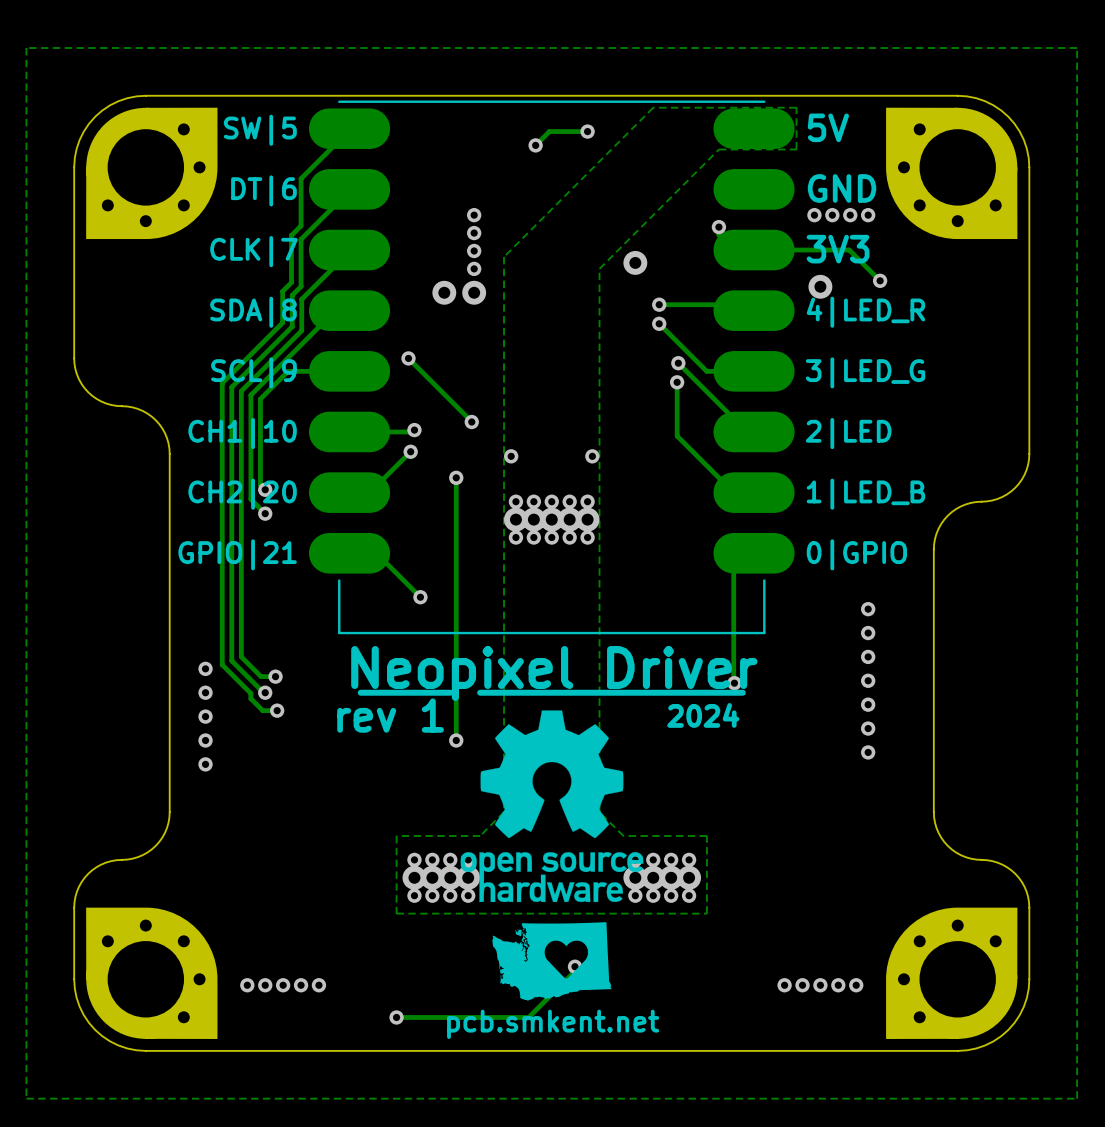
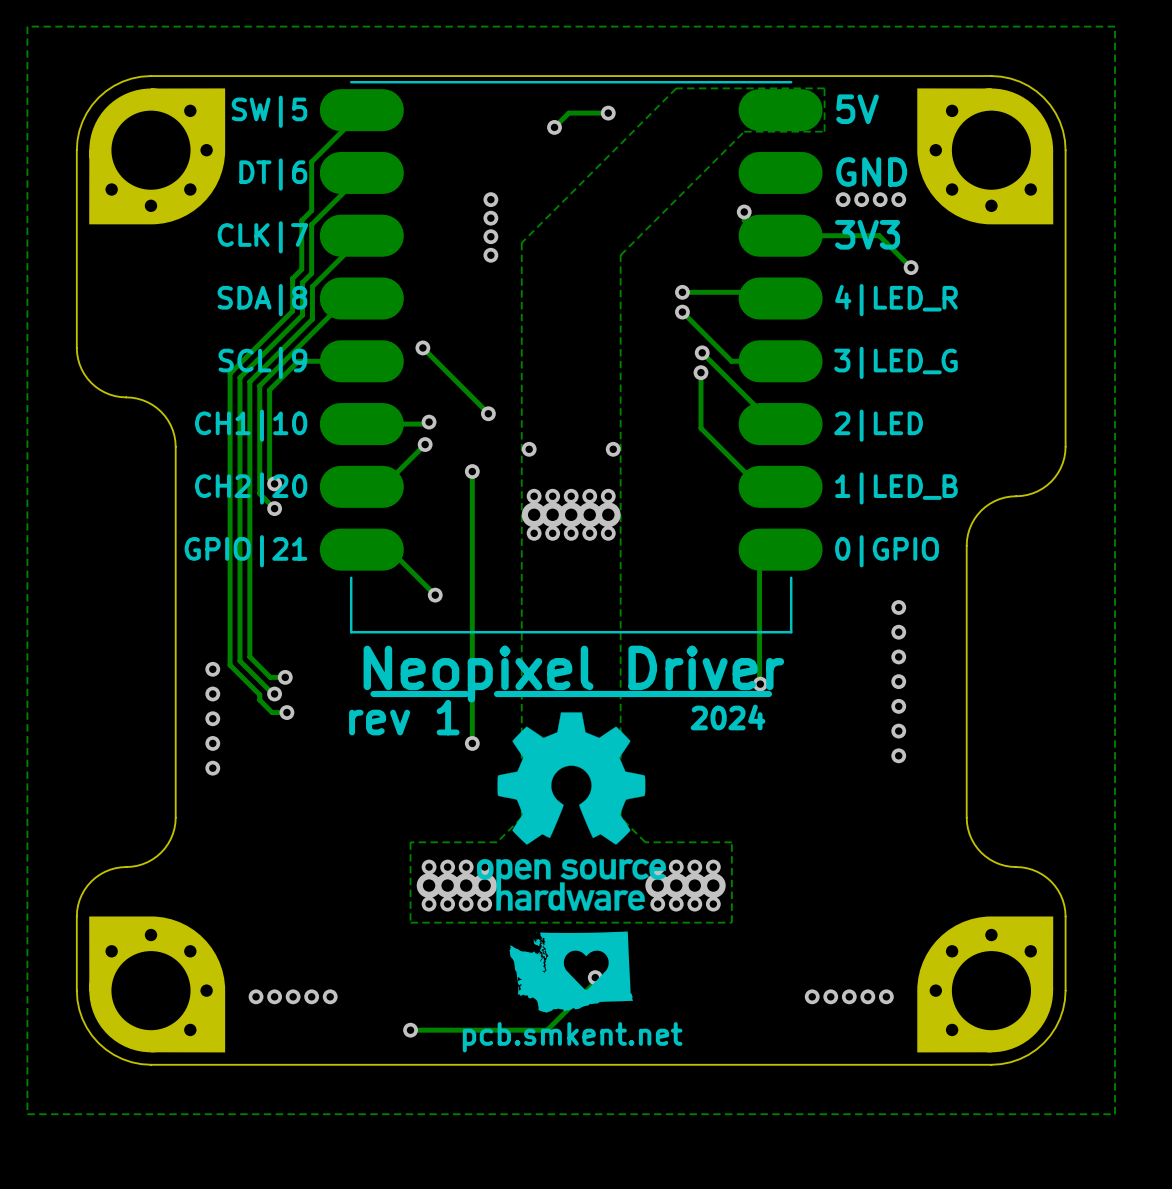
via: (635, 262) -> none
via: (820, 286) -> none
via: (444, 292) -> none
via: (474, 292) -> none

